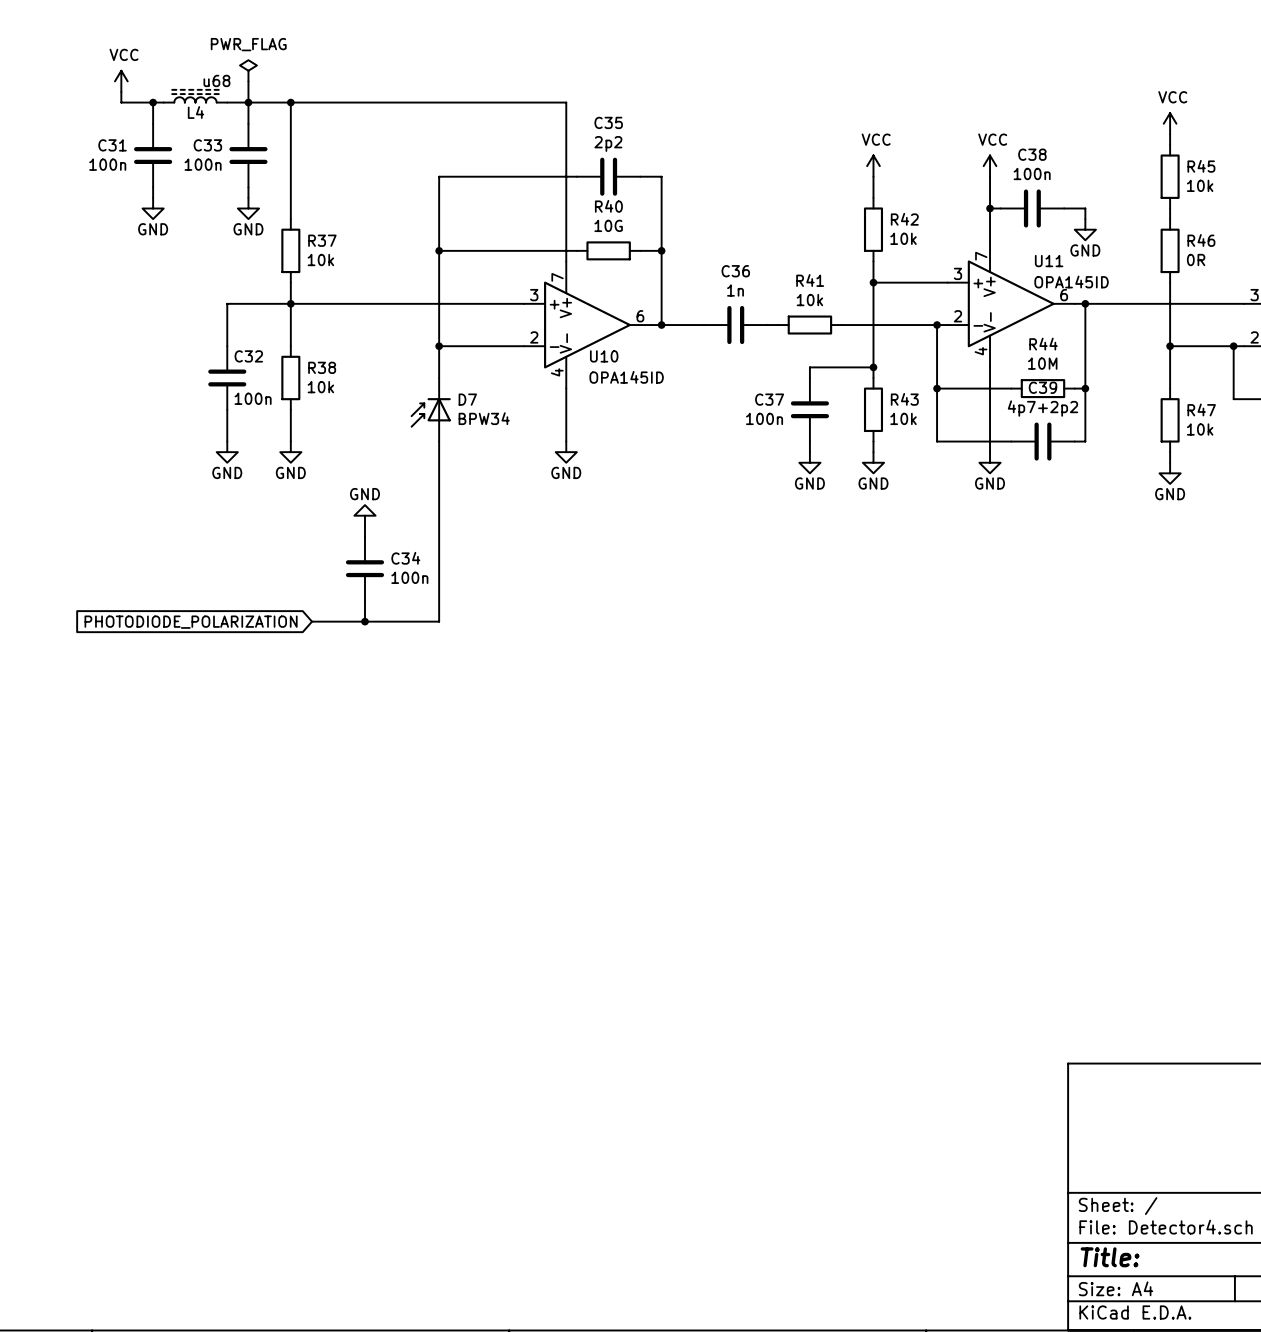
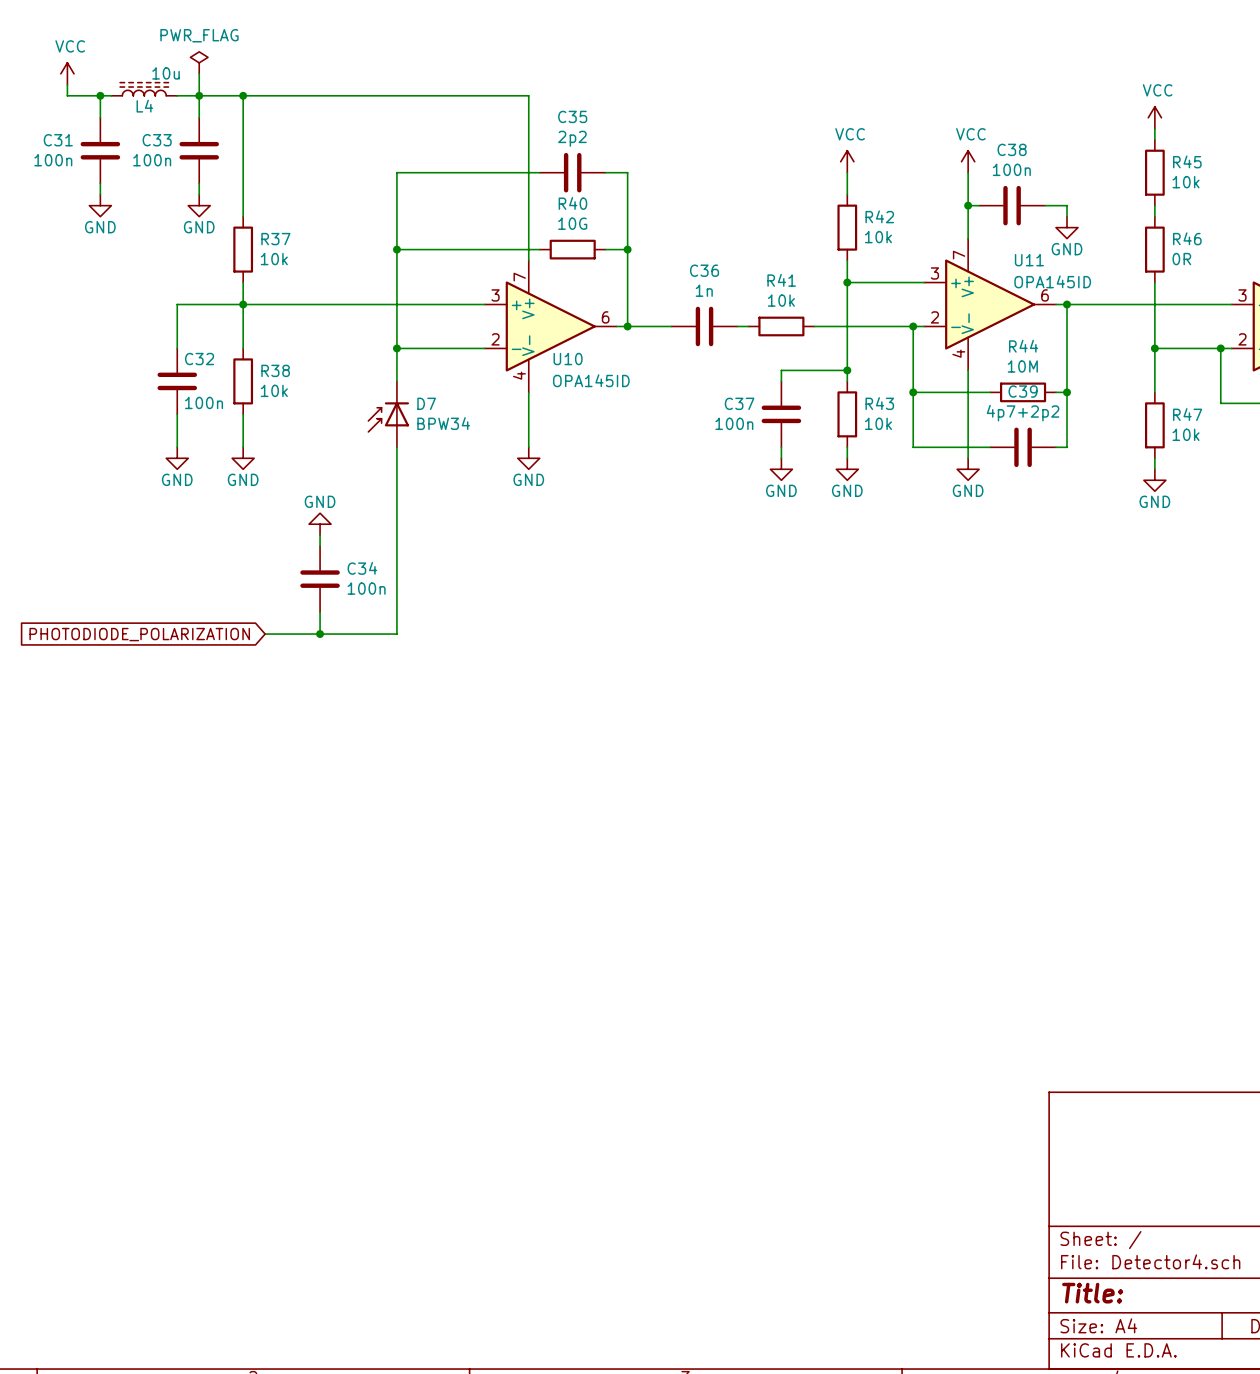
L4 value: u68 (216, 80) -> 10u (166, 73)

